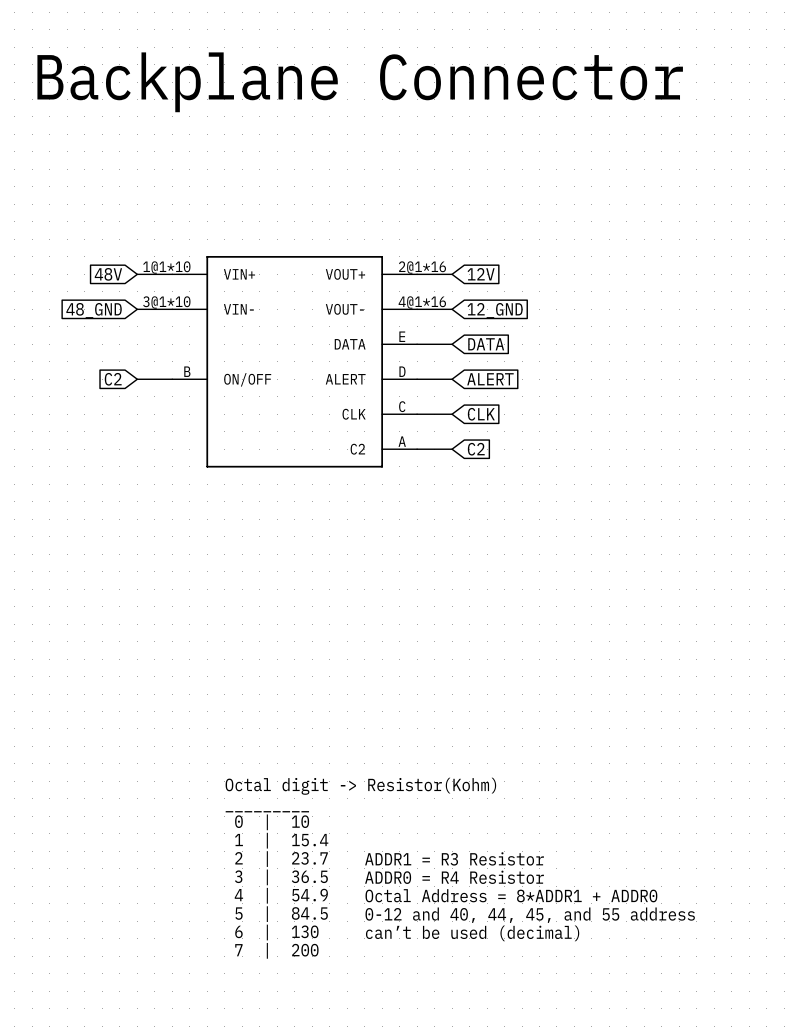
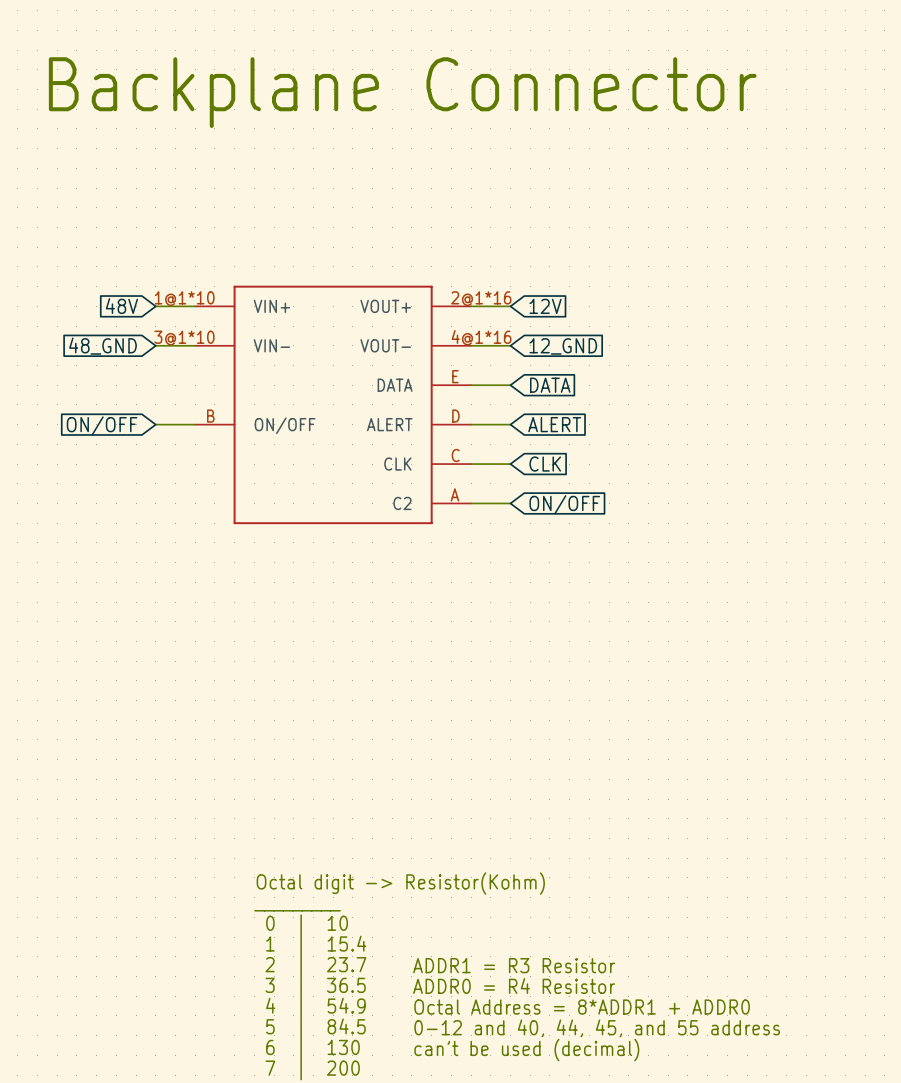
global label: C2 (113, 379) -> ON/OFF (102, 425)
global label: C2 (476, 449) -> ON/OFF (564, 504)

